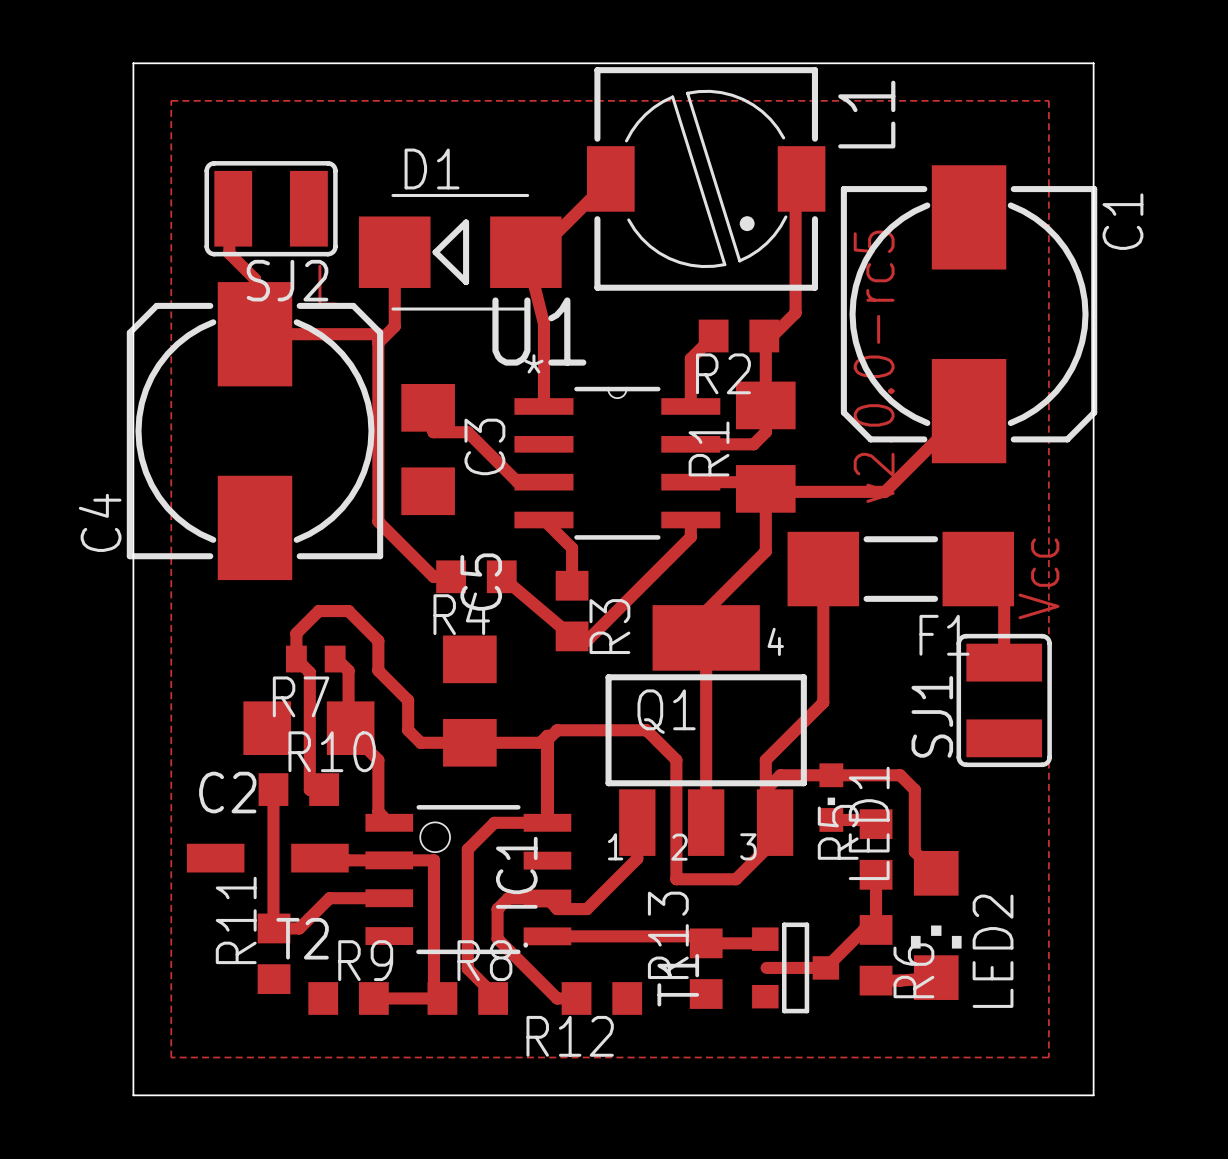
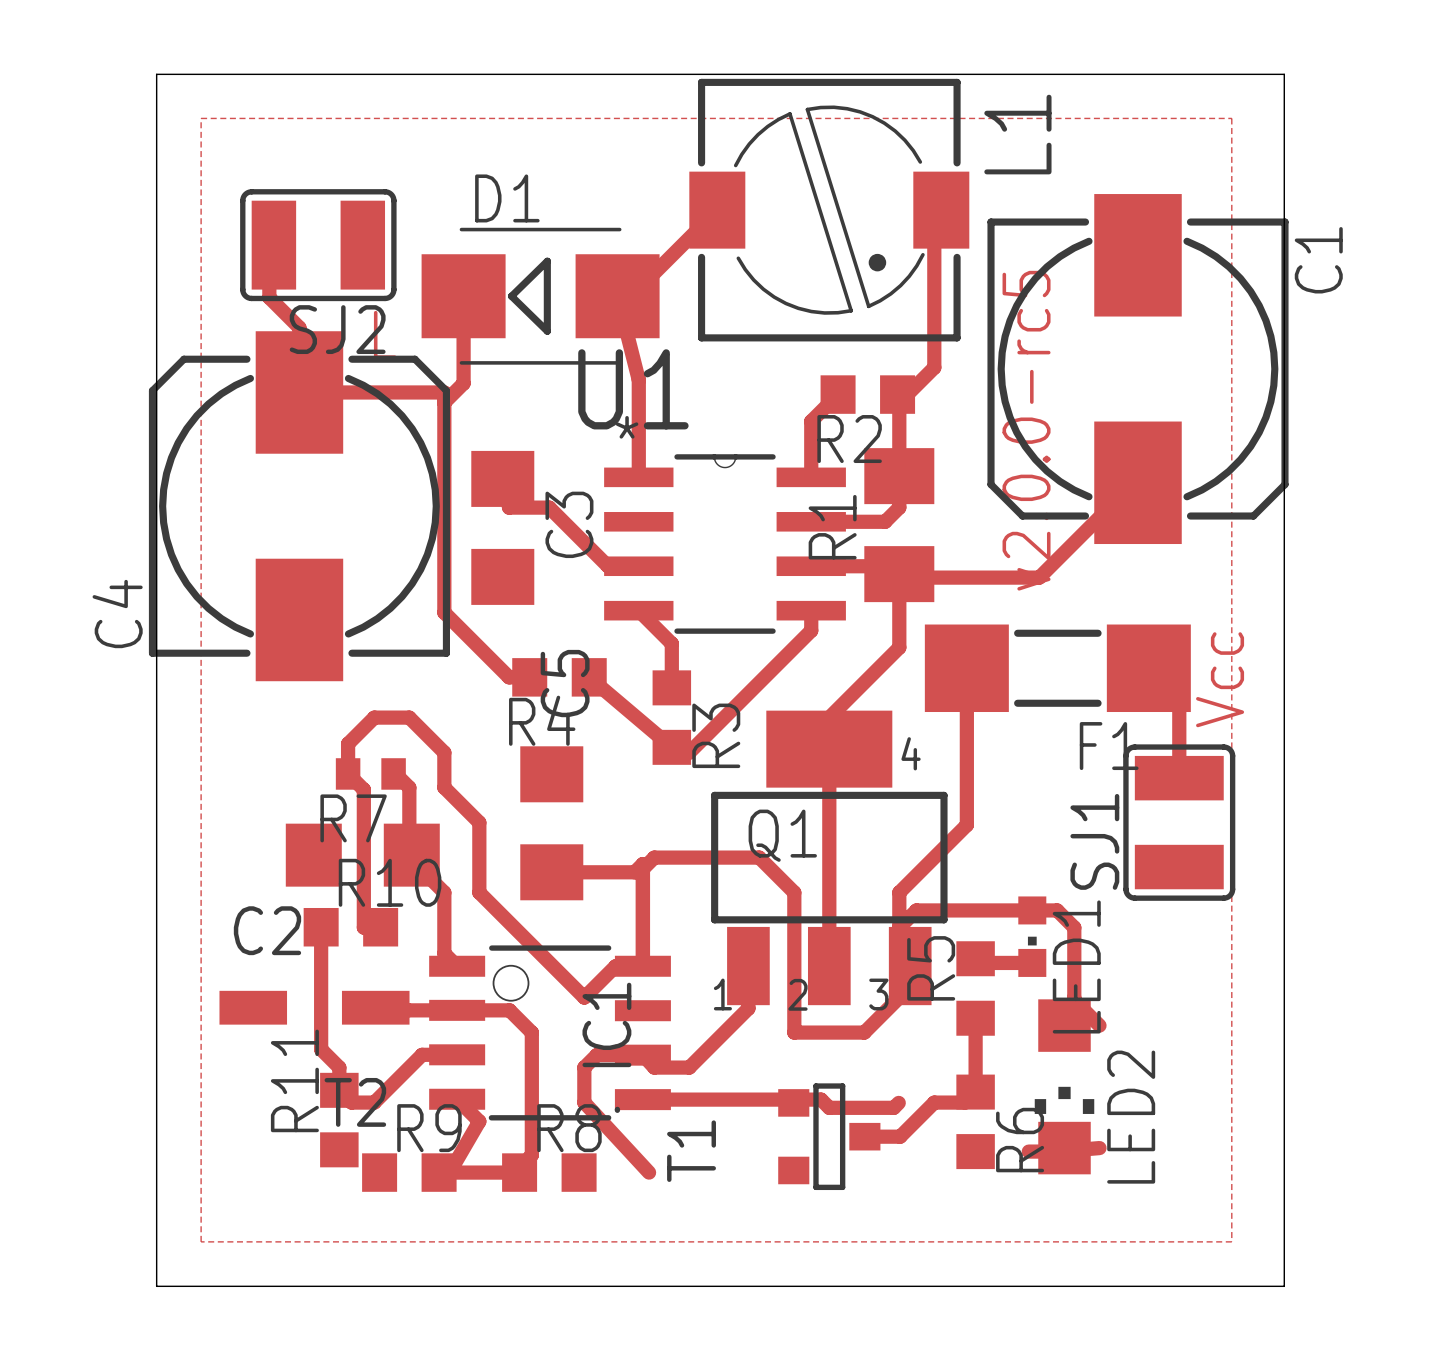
top track: (408, 730) (420, 742) (469, 742) -> (479, 857) (479, 892) (584, 997) (615, 966)
LED1 position: (831, 797) -> (1032, 936)
top track: (524, 822) (494, 822) (467, 849) (467, 968) (493, 994) (493, 998) -> none
R5 position: (876, 849) -> (975, 988)
top track: (433, 860) (433, 989) (442, 998) -> (509, 1010) (531, 1032) (531, 1155) (514, 1172)
top track: none -> (975, 1018) (975, 1092)
top track: (876, 874) (876, 929) (863, 929) (825, 967) (766, 967) -> none
top track: (273, 893) (274, 928) (299, 928) (329, 898) (359, 898) -> (321, 1049) (339, 1067) (339, 1090) (351, 1102) (374, 1102) (422, 1054)
LED2 position: (936, 925) -> (1064, 1086)
top track: none -> (975, 1092) (965, 1102) (934, 1102) (900, 1136) (864, 1136)
top track: none -> (457, 1099) (479, 1121) (449, 1172)
top track: (497, 938) (557, 998) (576, 998) -> (584, 1102) (649, 1172)
R11 position: (274, 953) -> (339, 1120)
R6 position: (876, 955) -> (975, 1121)
T1 position: (795, 967) -> (829, 1136)
R13: (706, 968) -> none
R12: (601, 998) -> none

